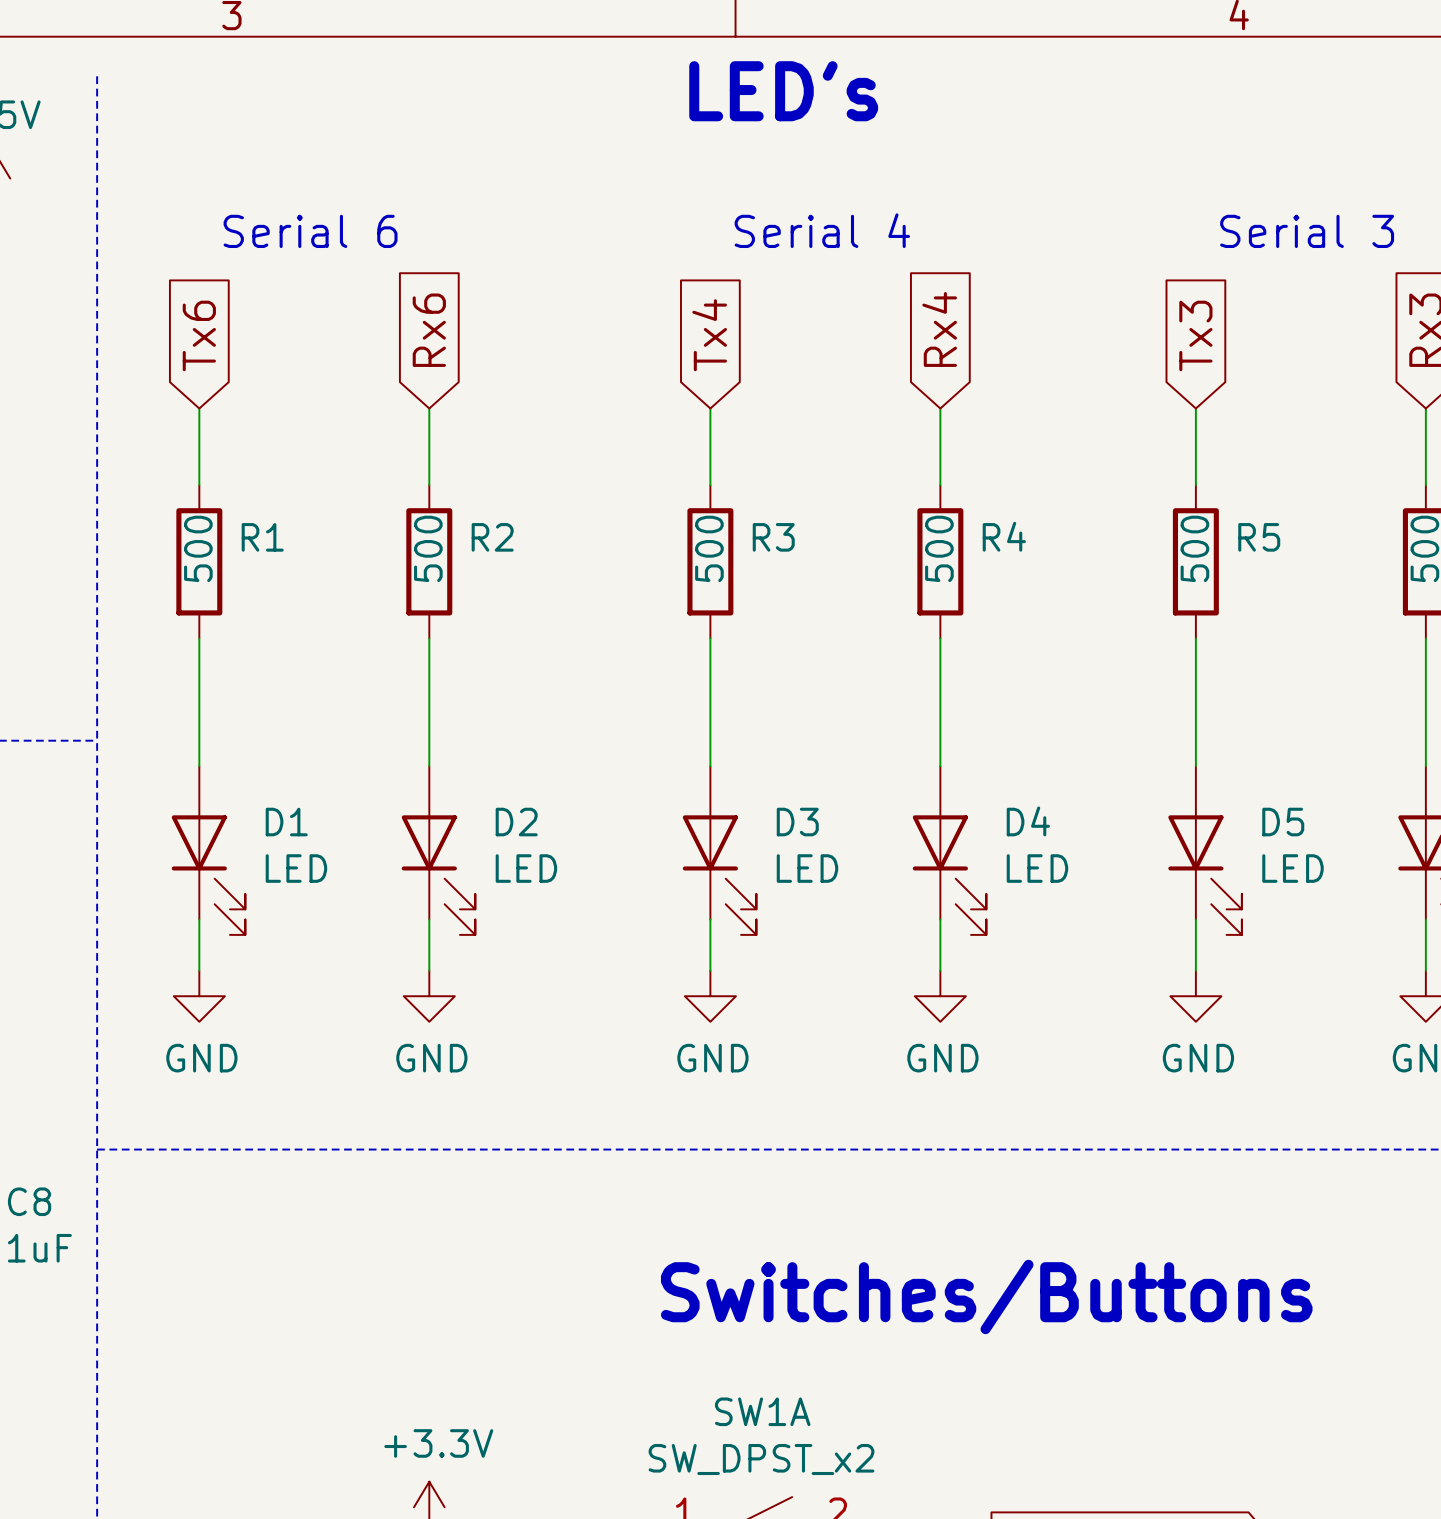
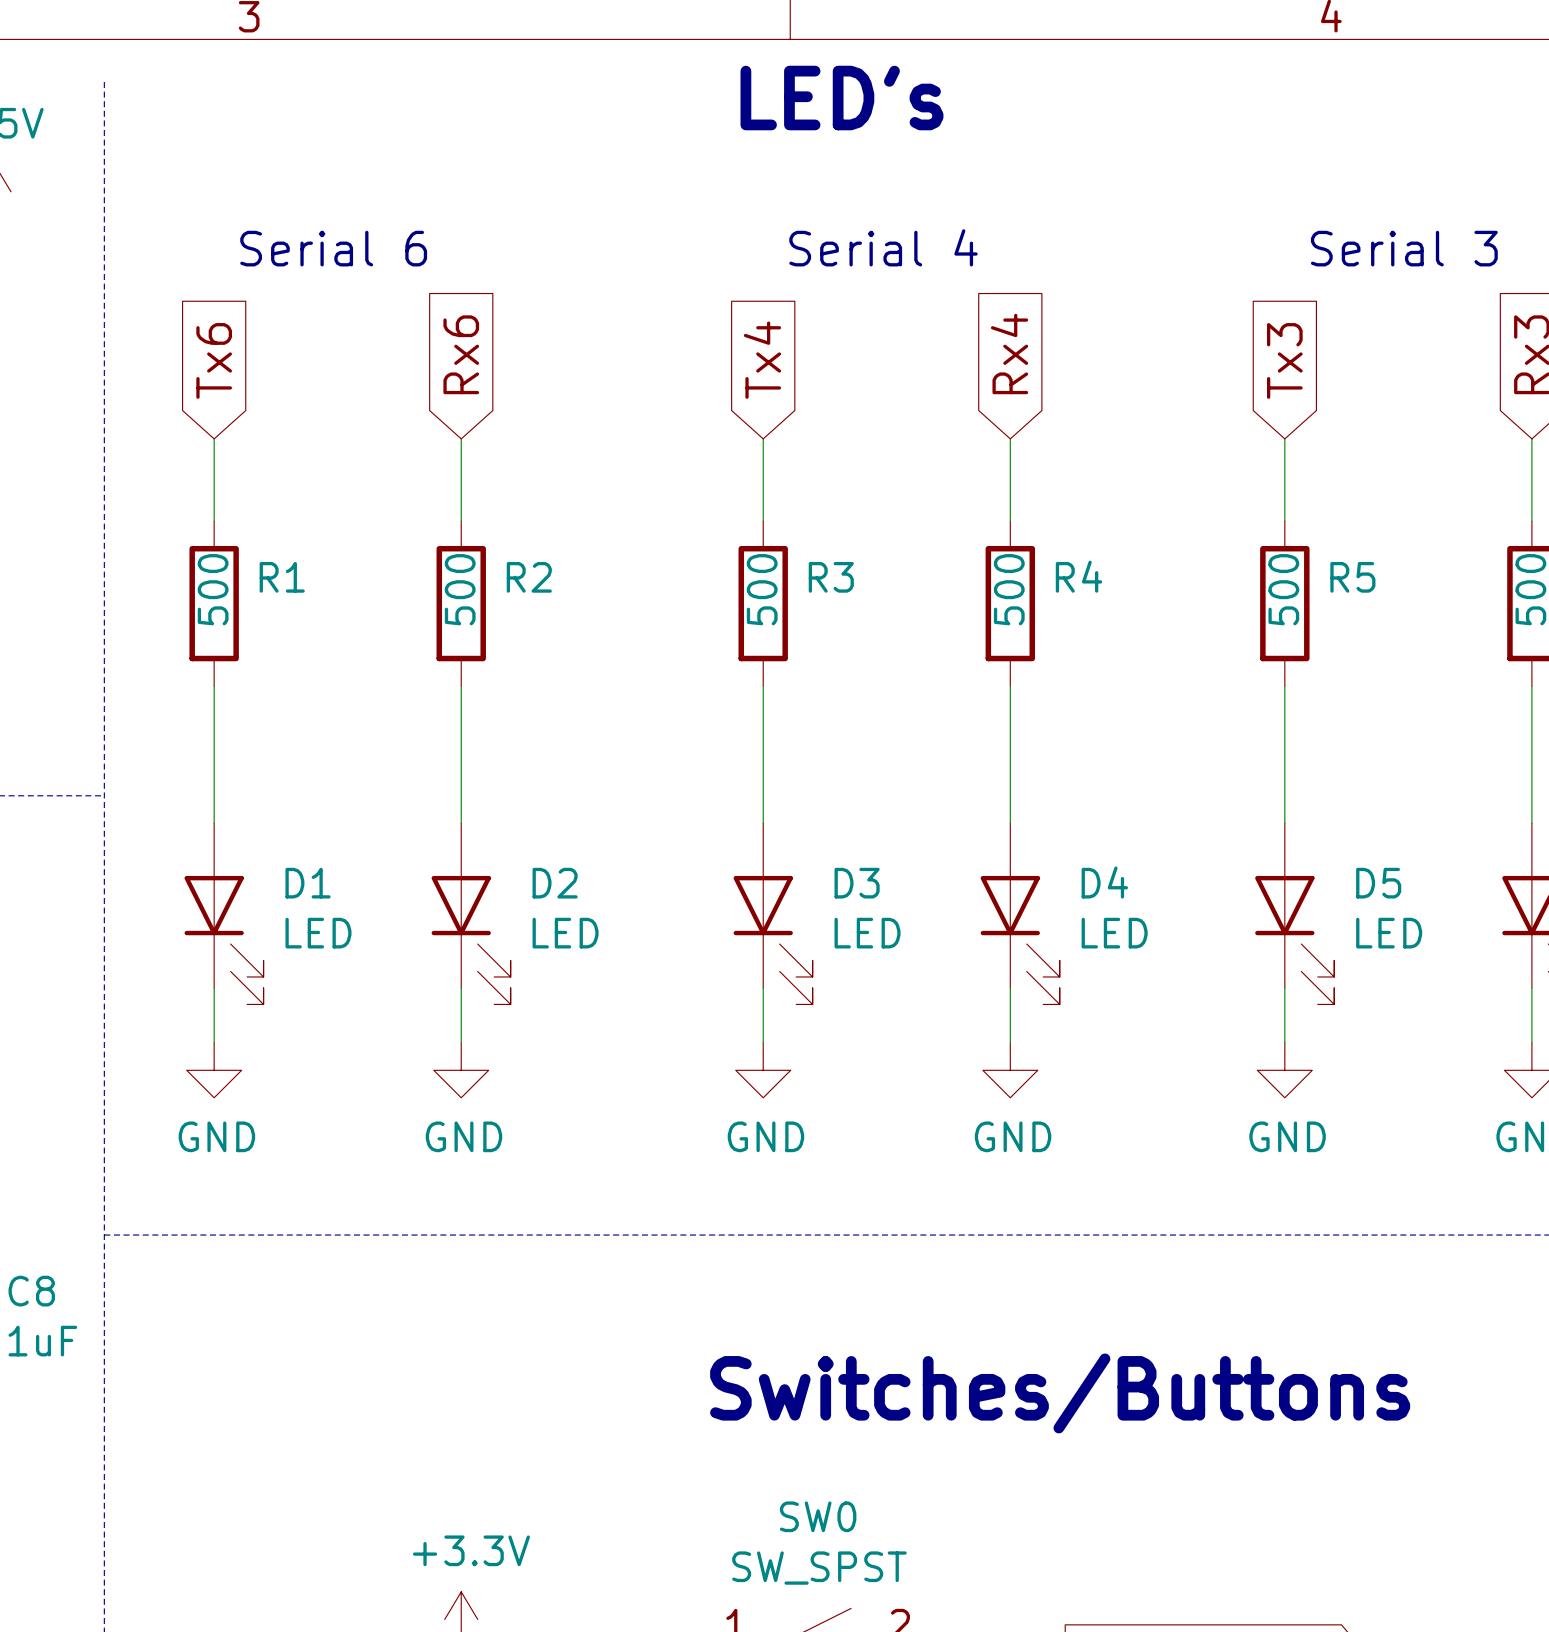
SW1A name: SW1A (762, 1411) -> SW0 (818, 1516)
SW1A value: SW_DPST_x2 (761, 1459) -> SW_SPST (819, 1568)

